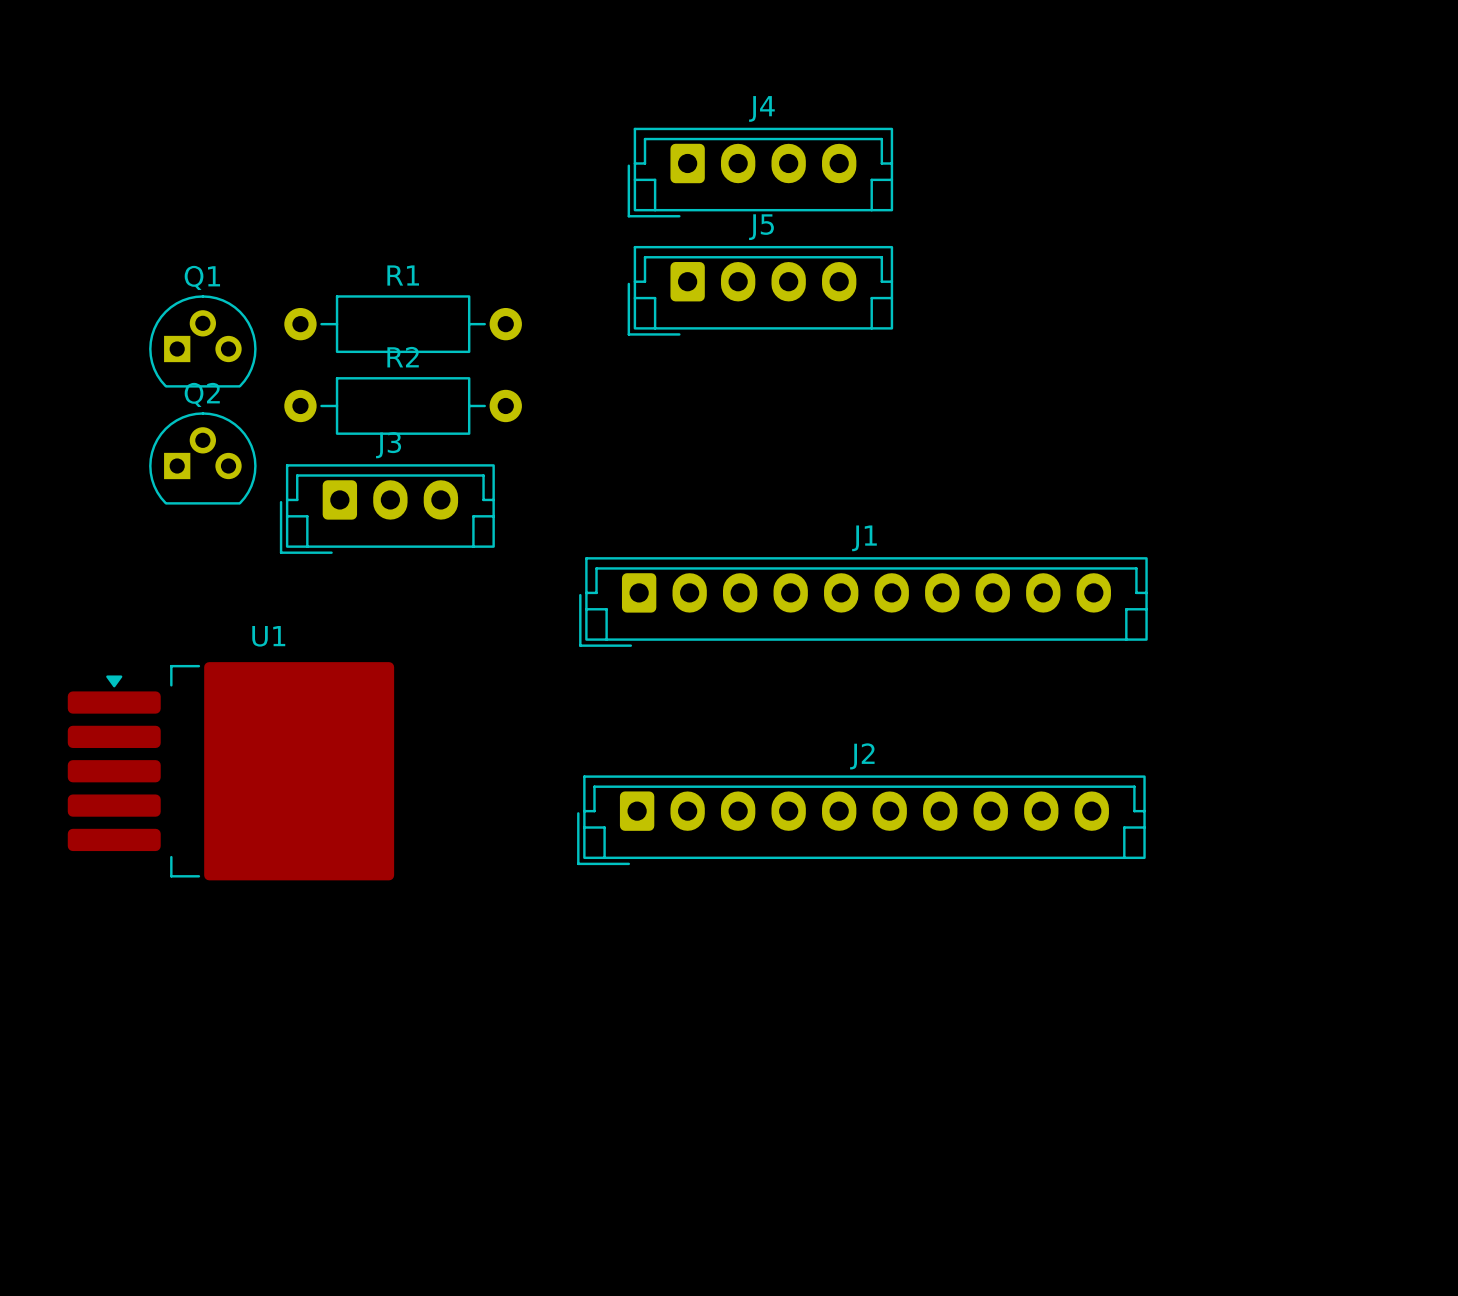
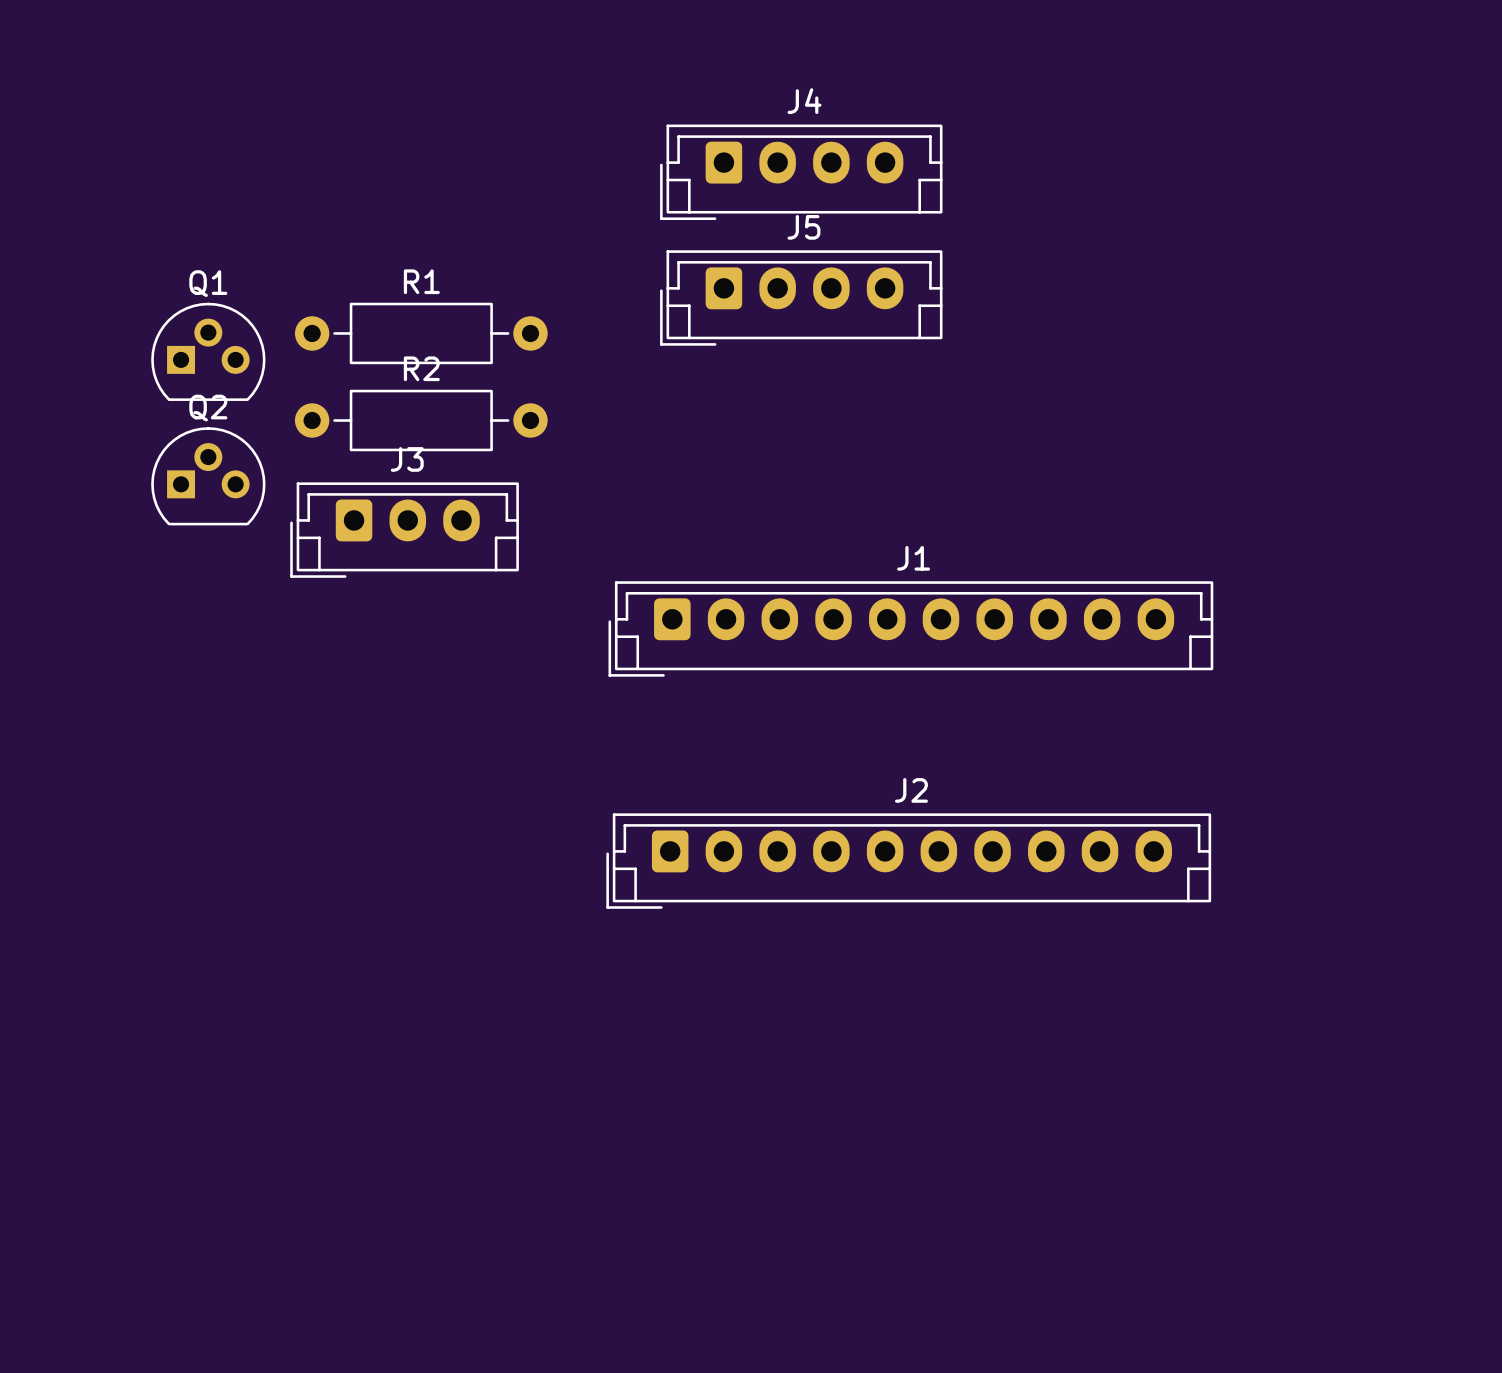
U1: (230, 771) -> none

